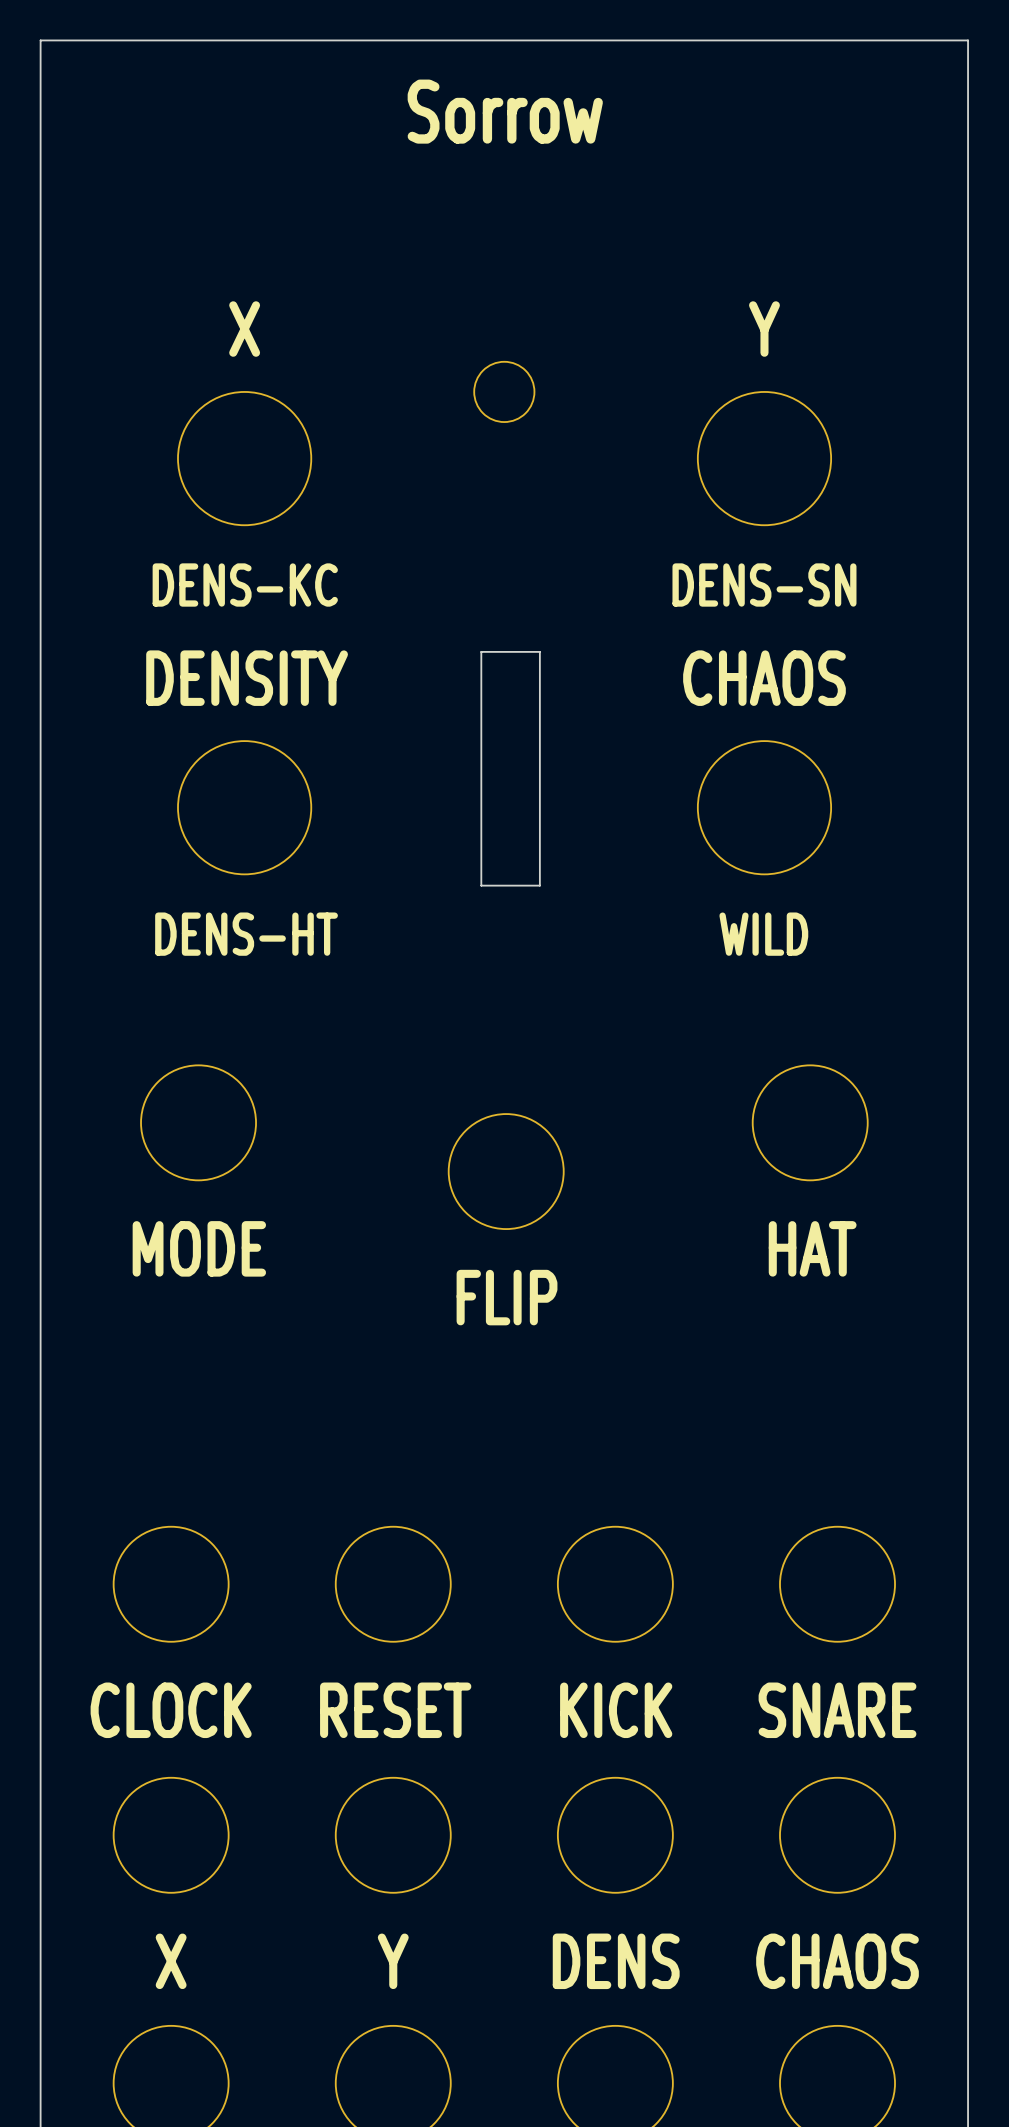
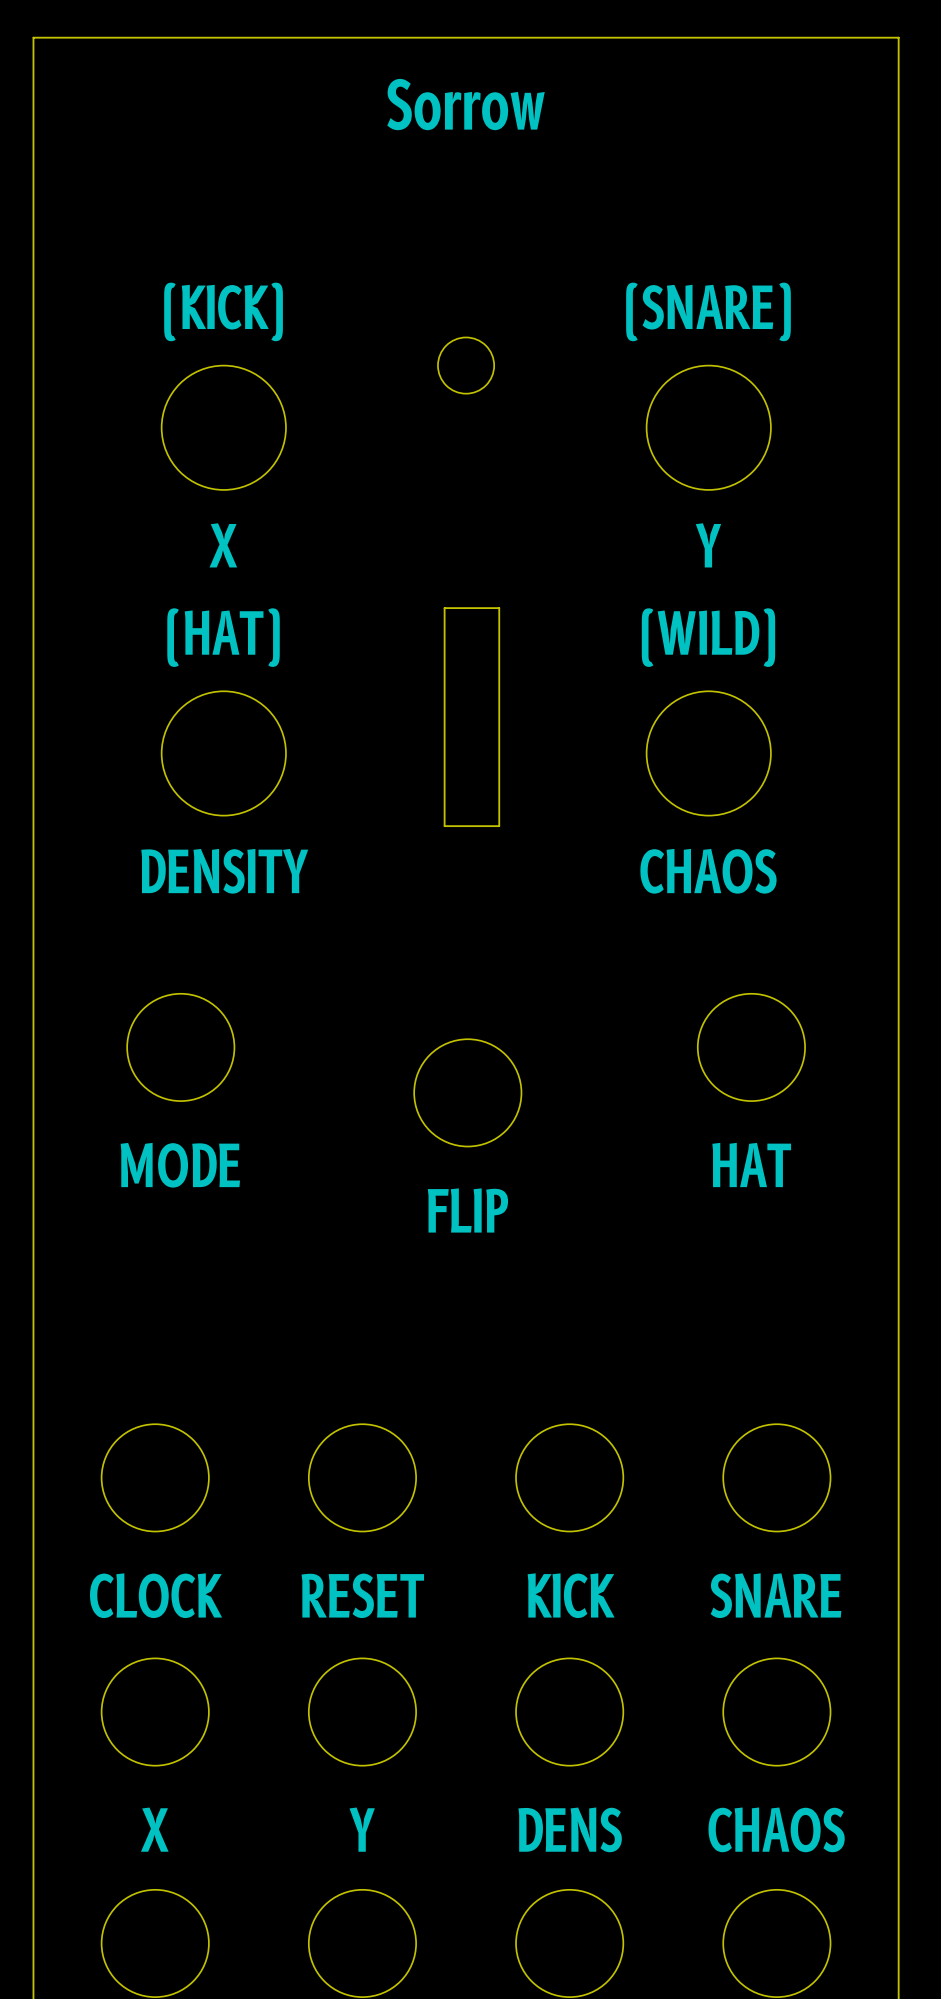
text: X (244, 329) -> (KICK) (223, 311)
text: Y (764, 329) -> (SNARE) (708, 311)
text: DENS-KC (245, 585) -> X (223, 545)
text: DENS-SN (764, 585) -> Y (708, 545)
text: DENSITY (247, 678) -> (HAT) (223, 637)
text: CHAOS (764, 678) -> (WILD) (708, 637)
text: DENS-HT (246, 934) -> DENSITY (224, 871)
text: WILD (763, 934) -> CHAOS (708, 871)

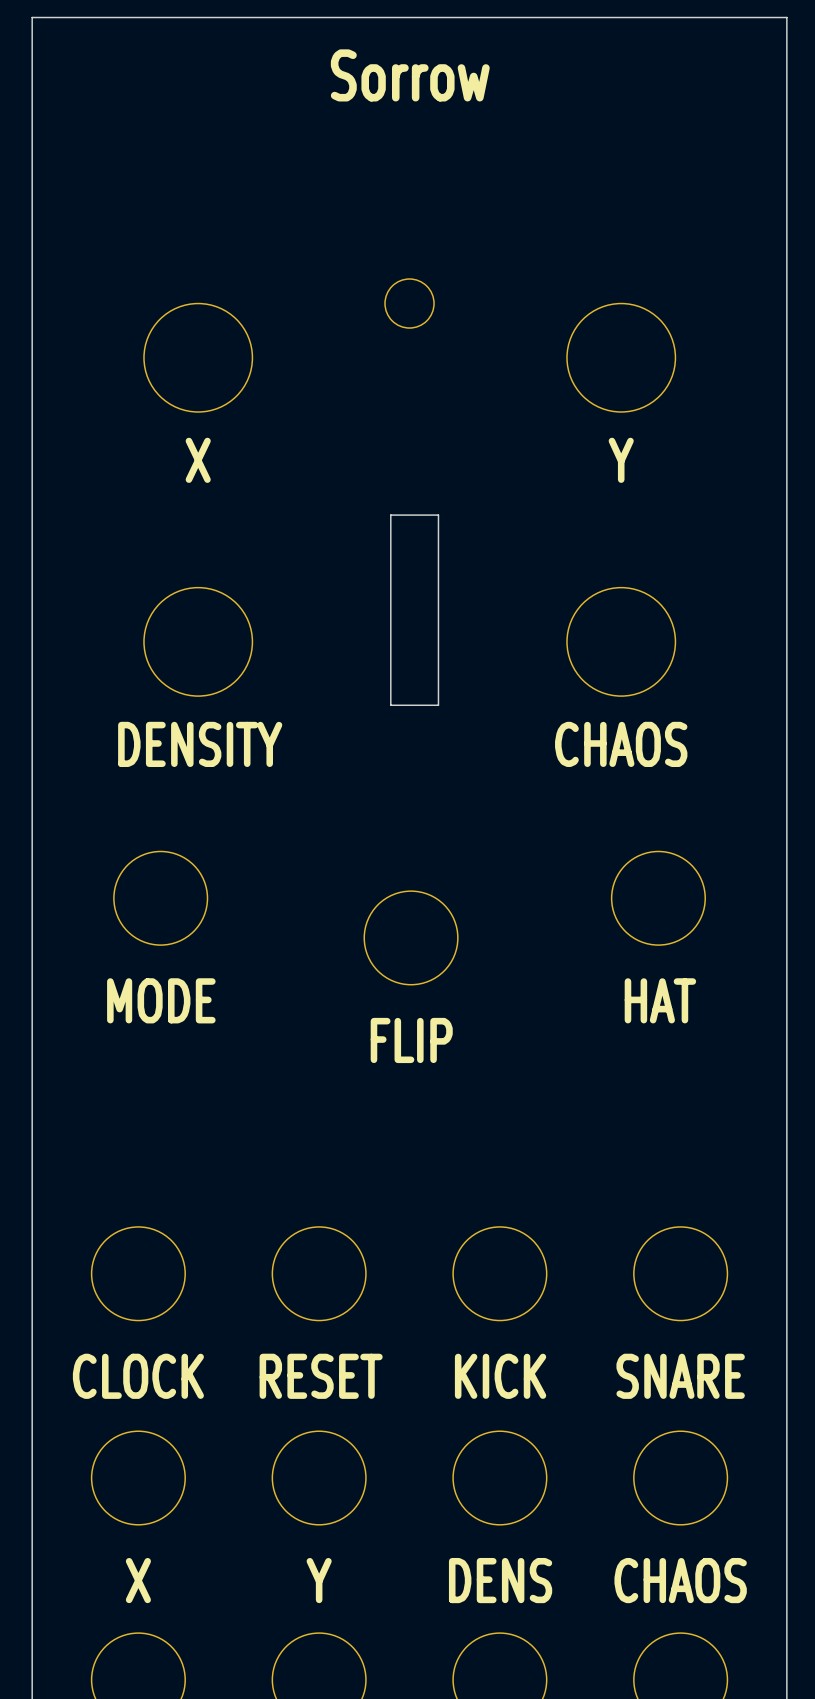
text: (KICK) (223, 311) -> none
text: (SNARE) (708, 311) -> none
text: (HAT) (223, 637) -> none
text: (WILD) (708, 637) -> none

